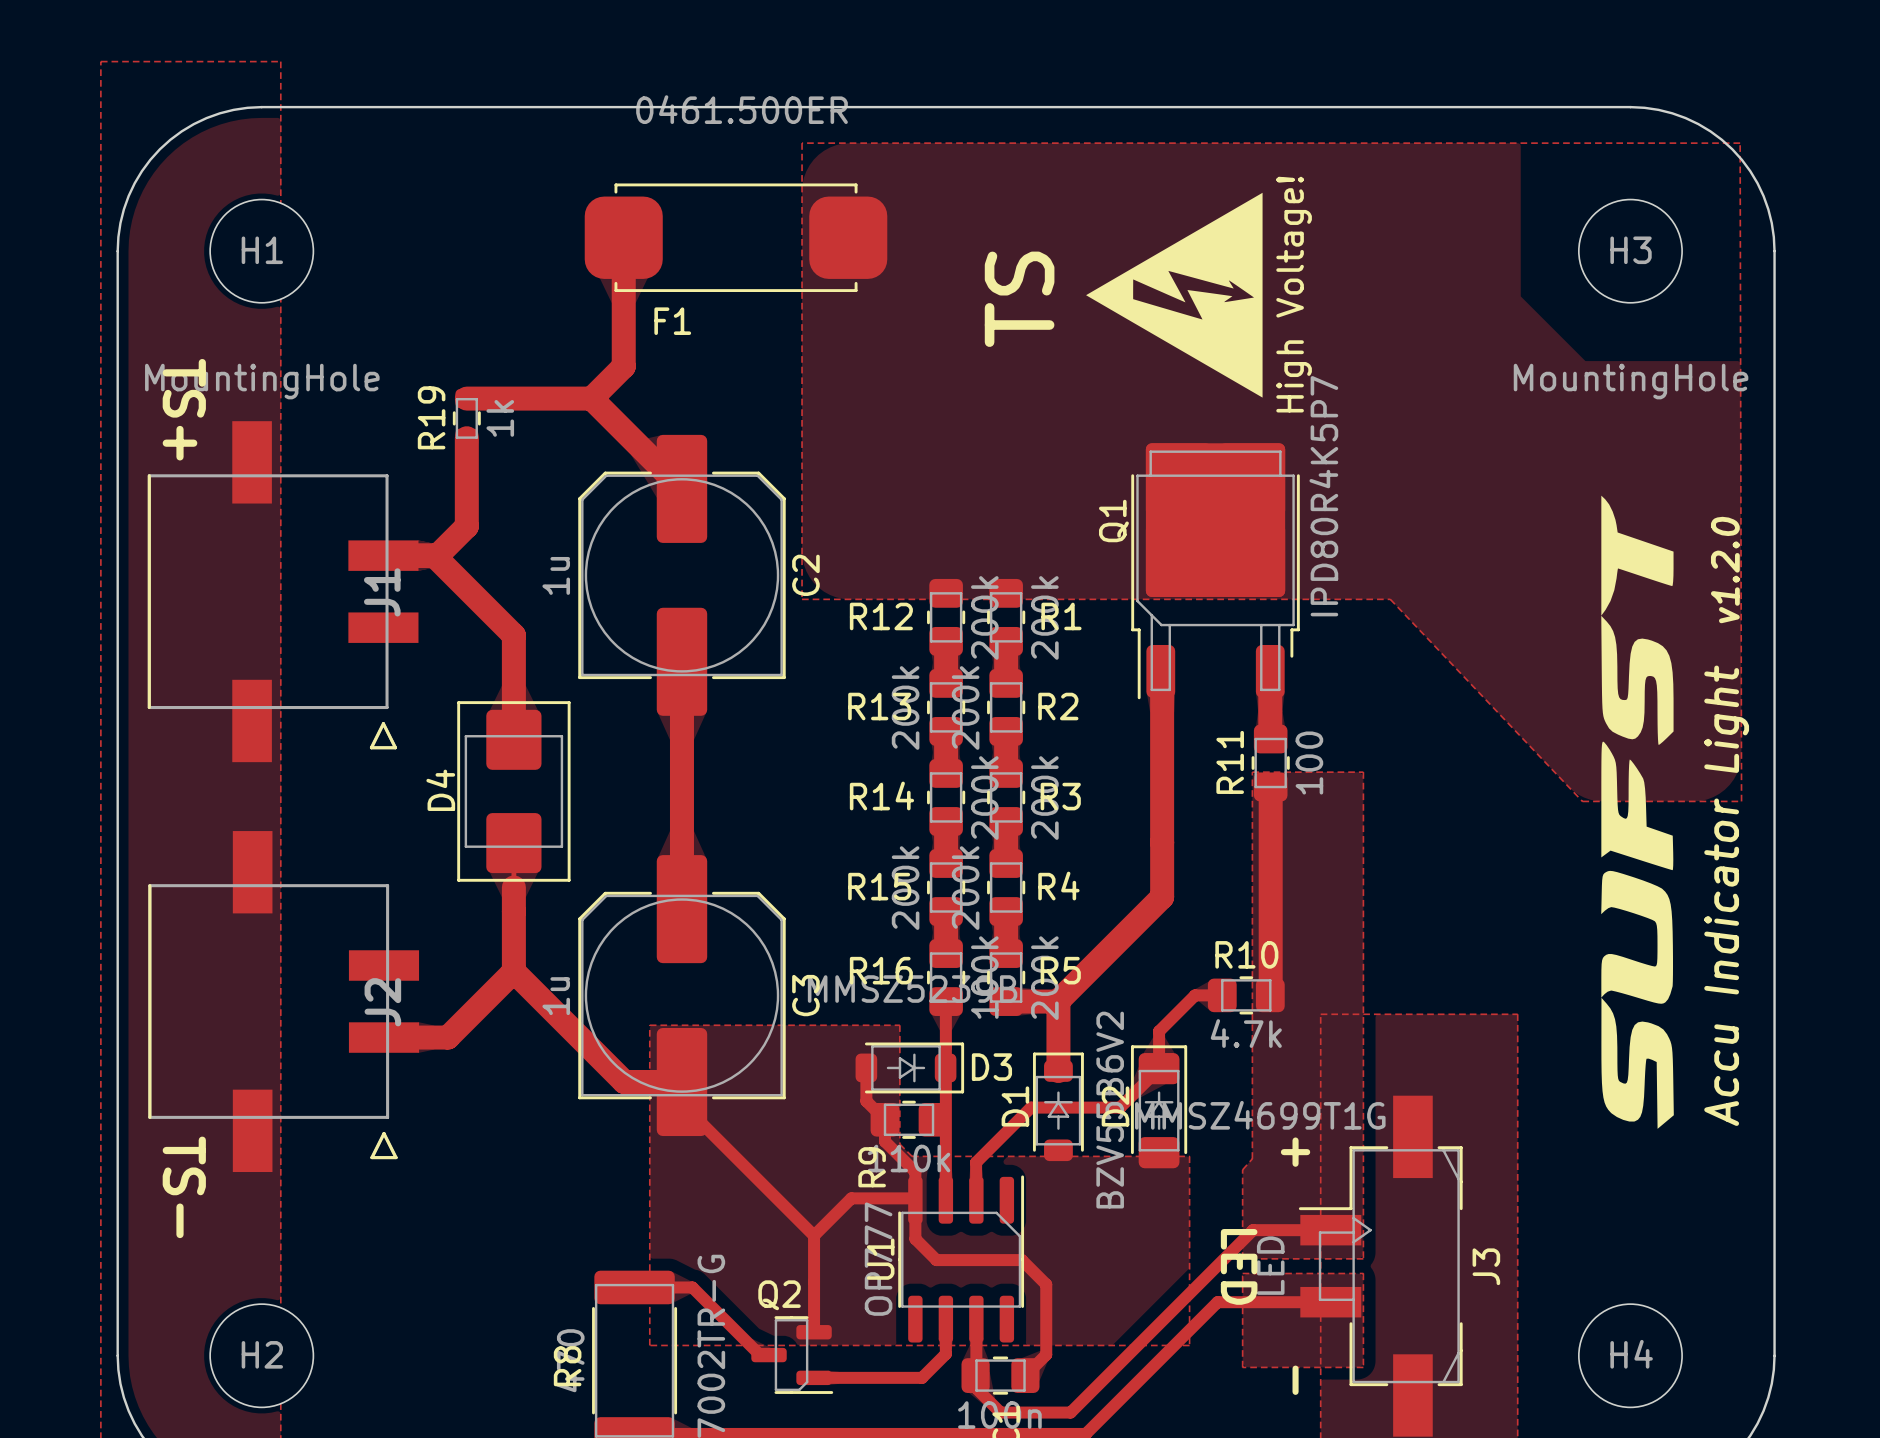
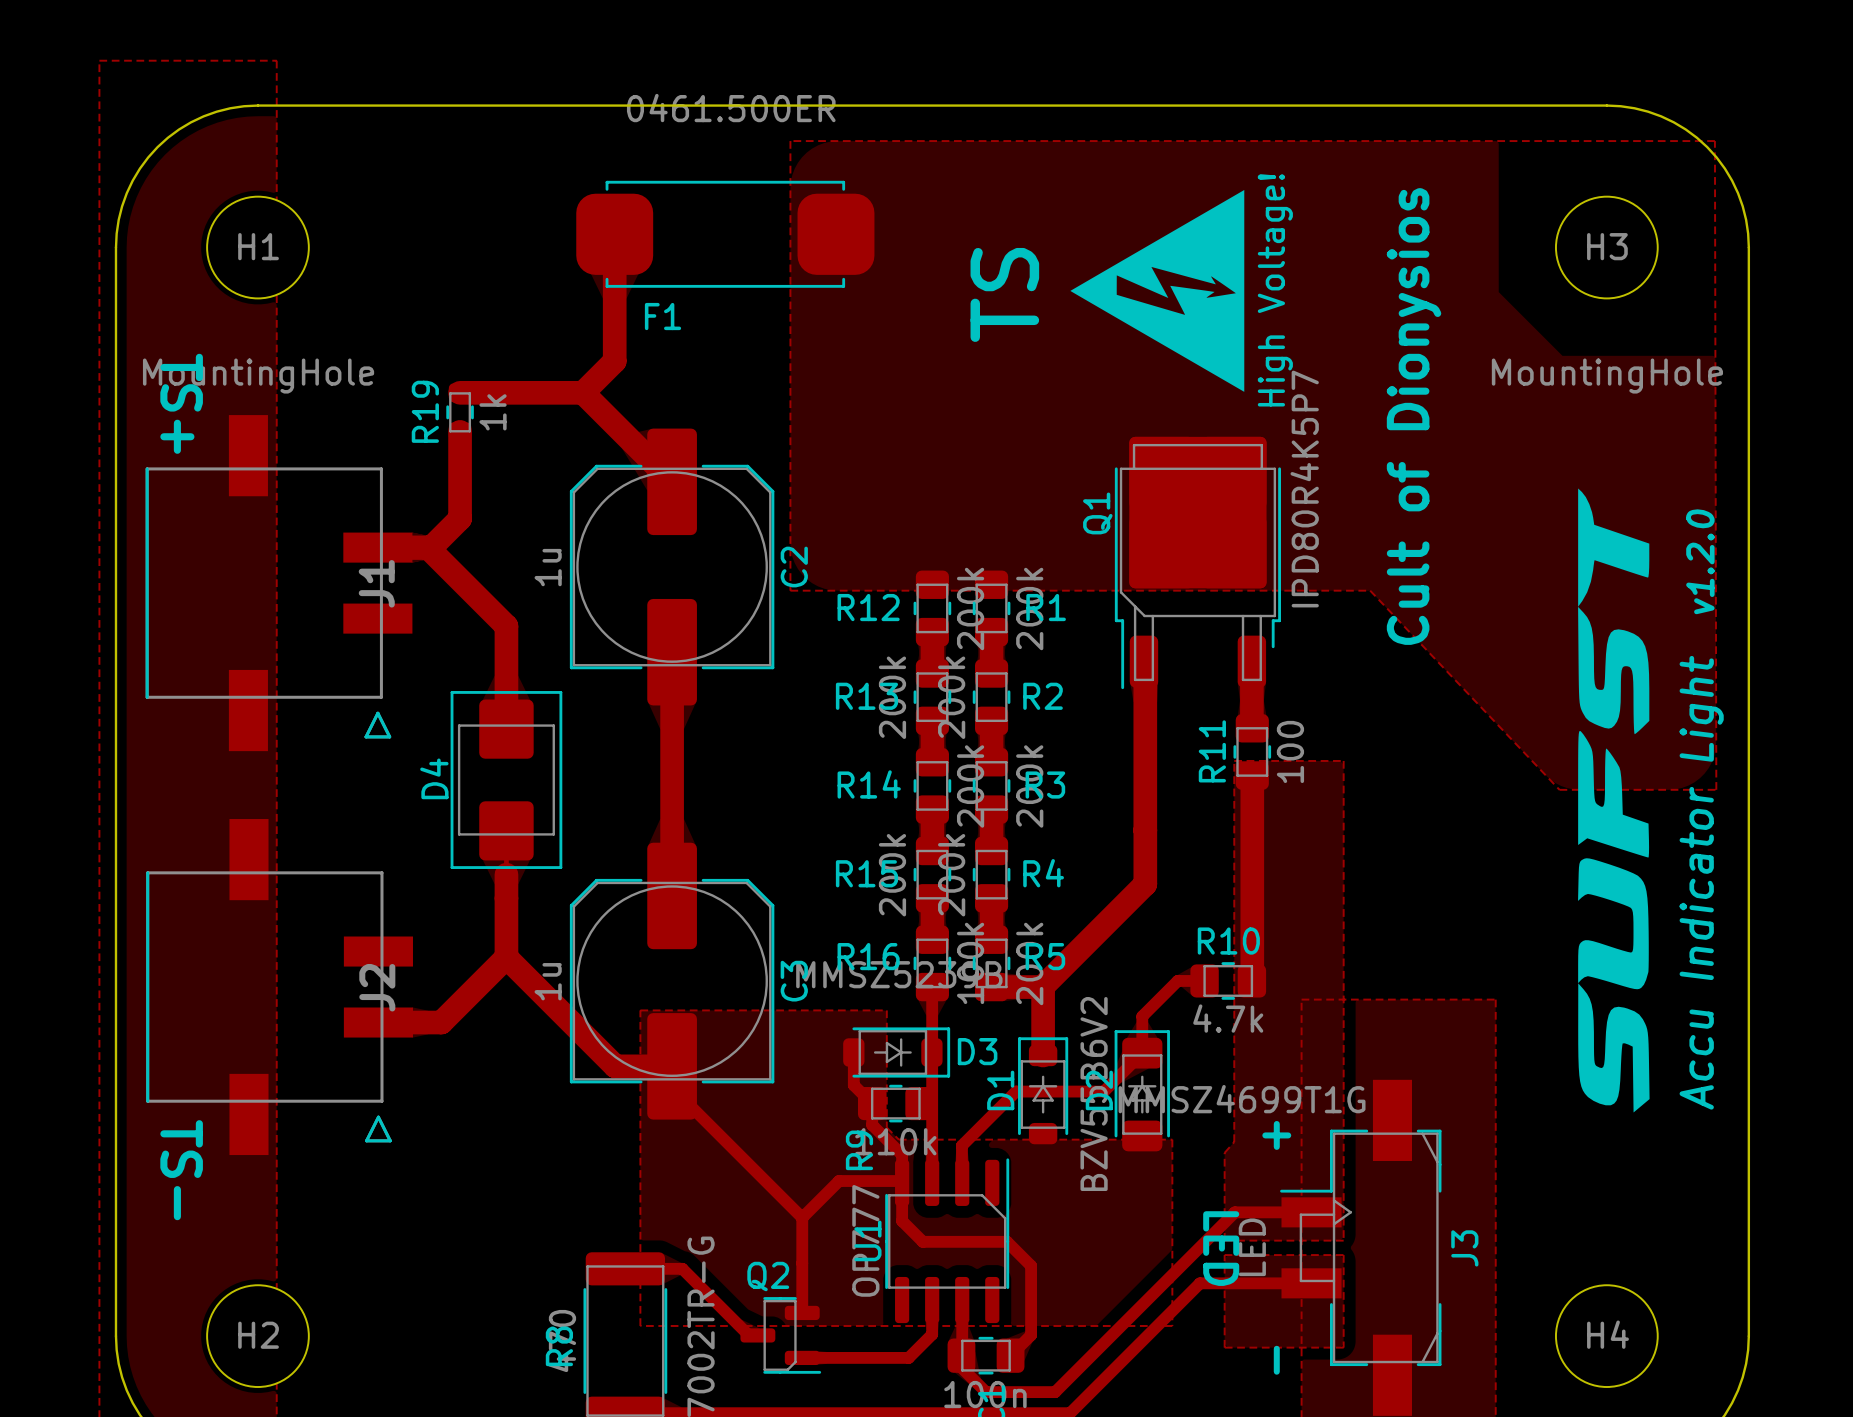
text: none -> Cult of Dionysios (1414, 416)

